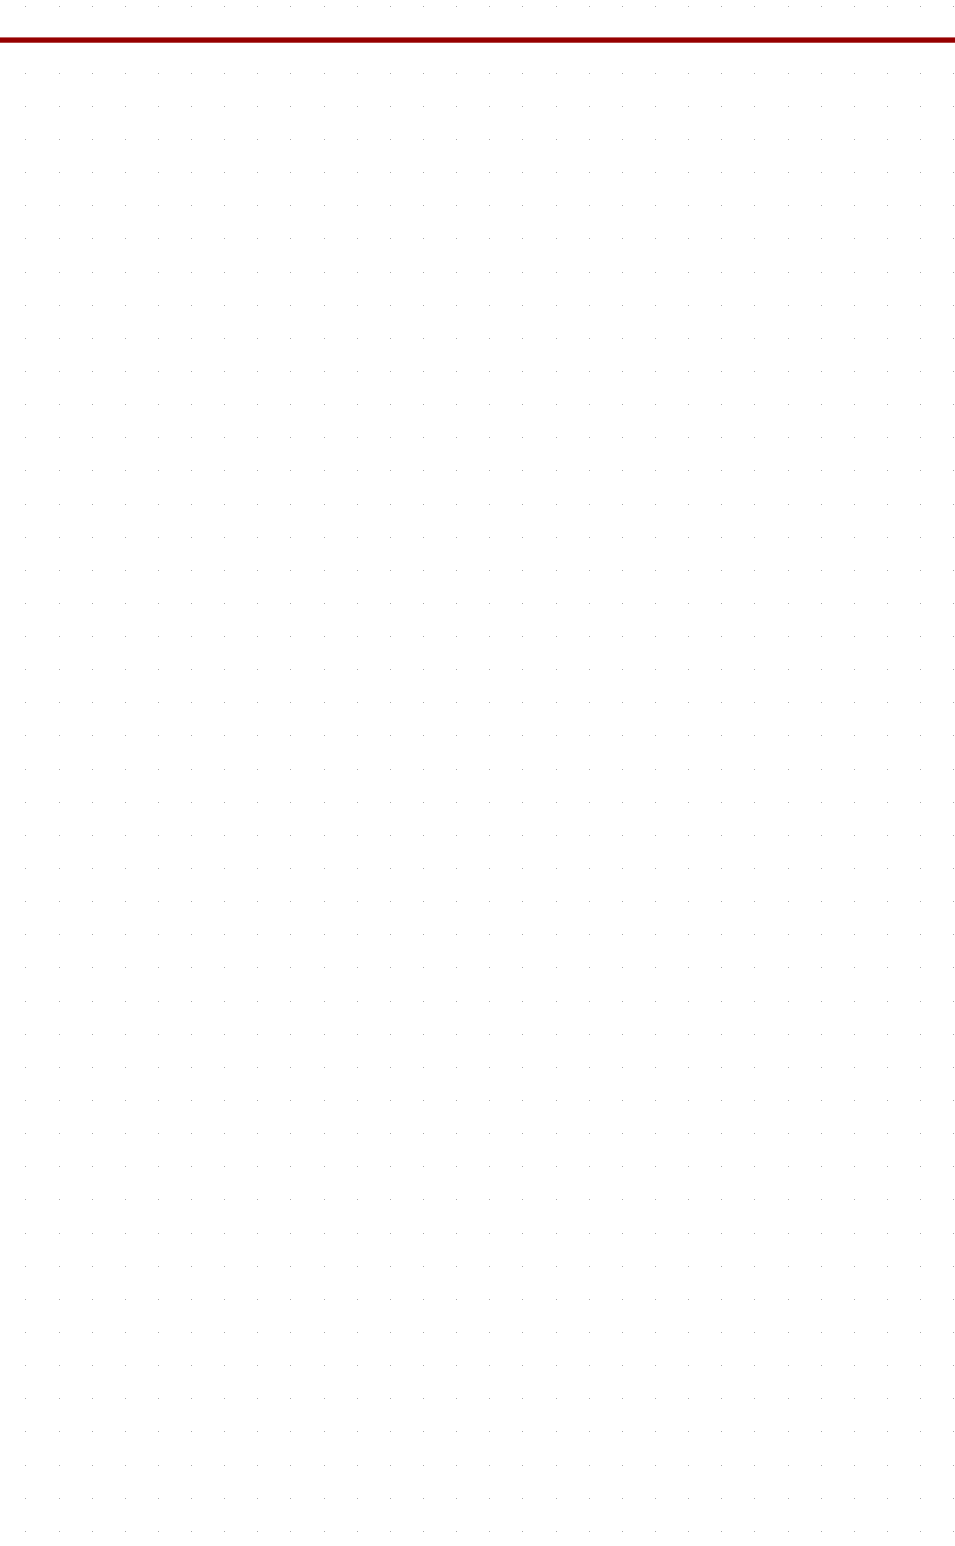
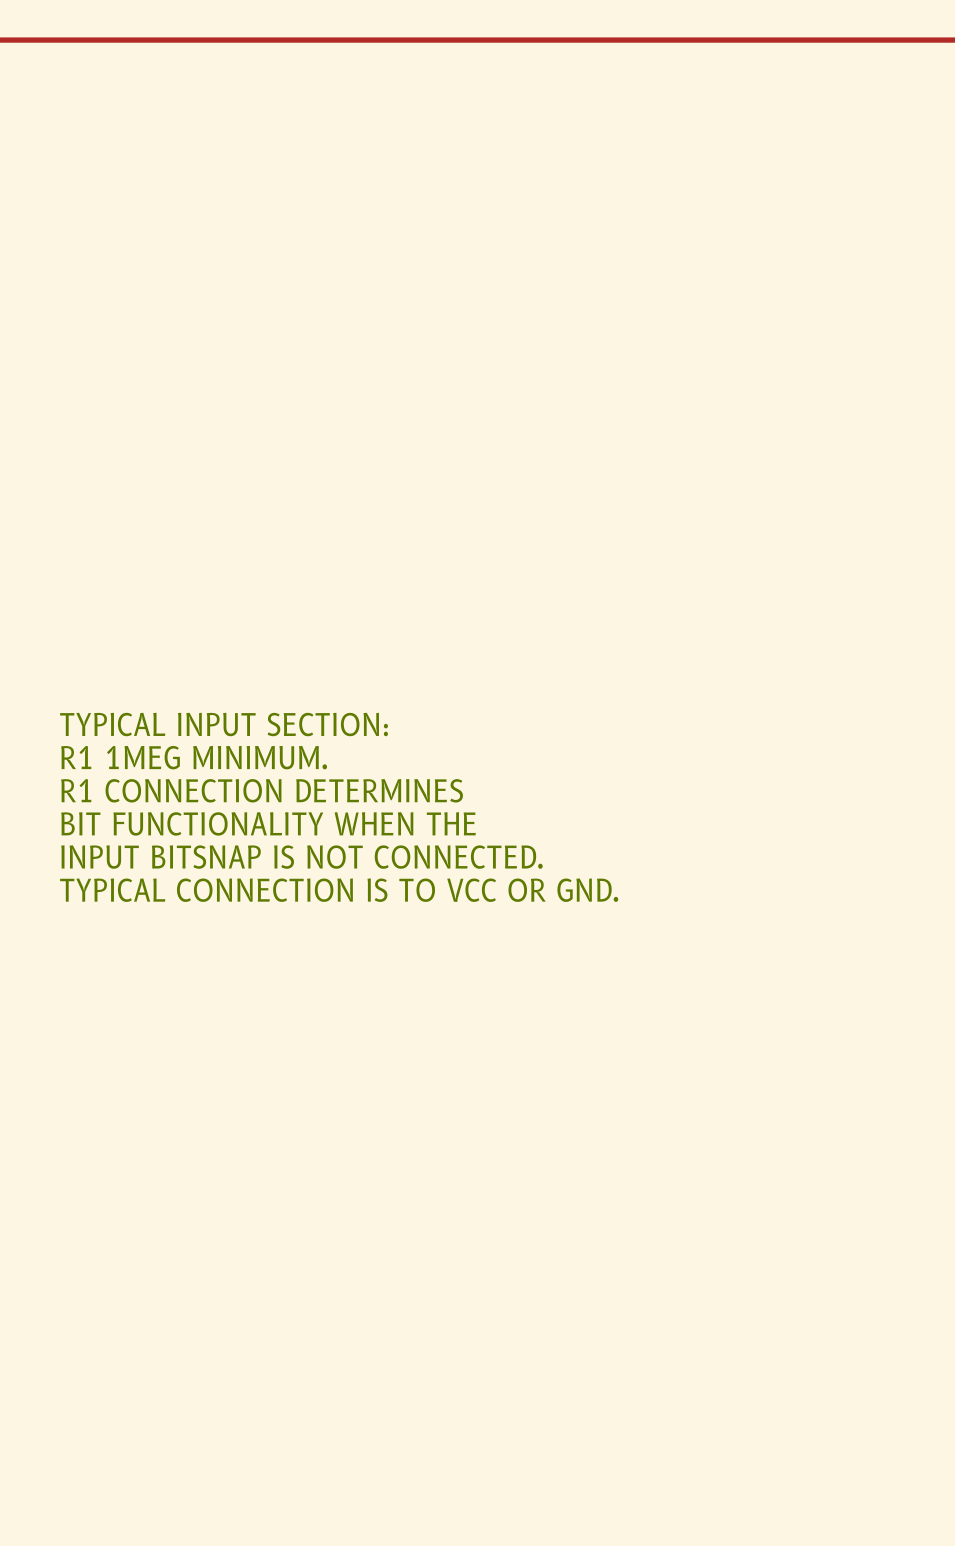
text: none -> TYPICAL INPUT SECTION: (224, 724)
text: none -> R1 1MEG MINIMUM. (194, 757)
text: none -> R1 CONNECTION DETERMINES (262, 790)
text: none -> BIT FUNCTIONALITY WHEN THE (268, 823)
text: none -> INPUT BITSNAP IS NOT CONNECTED. (301, 857)
text: none -> TYPICAL CONNECTION IS TO VCC OR GND. (339, 890)

